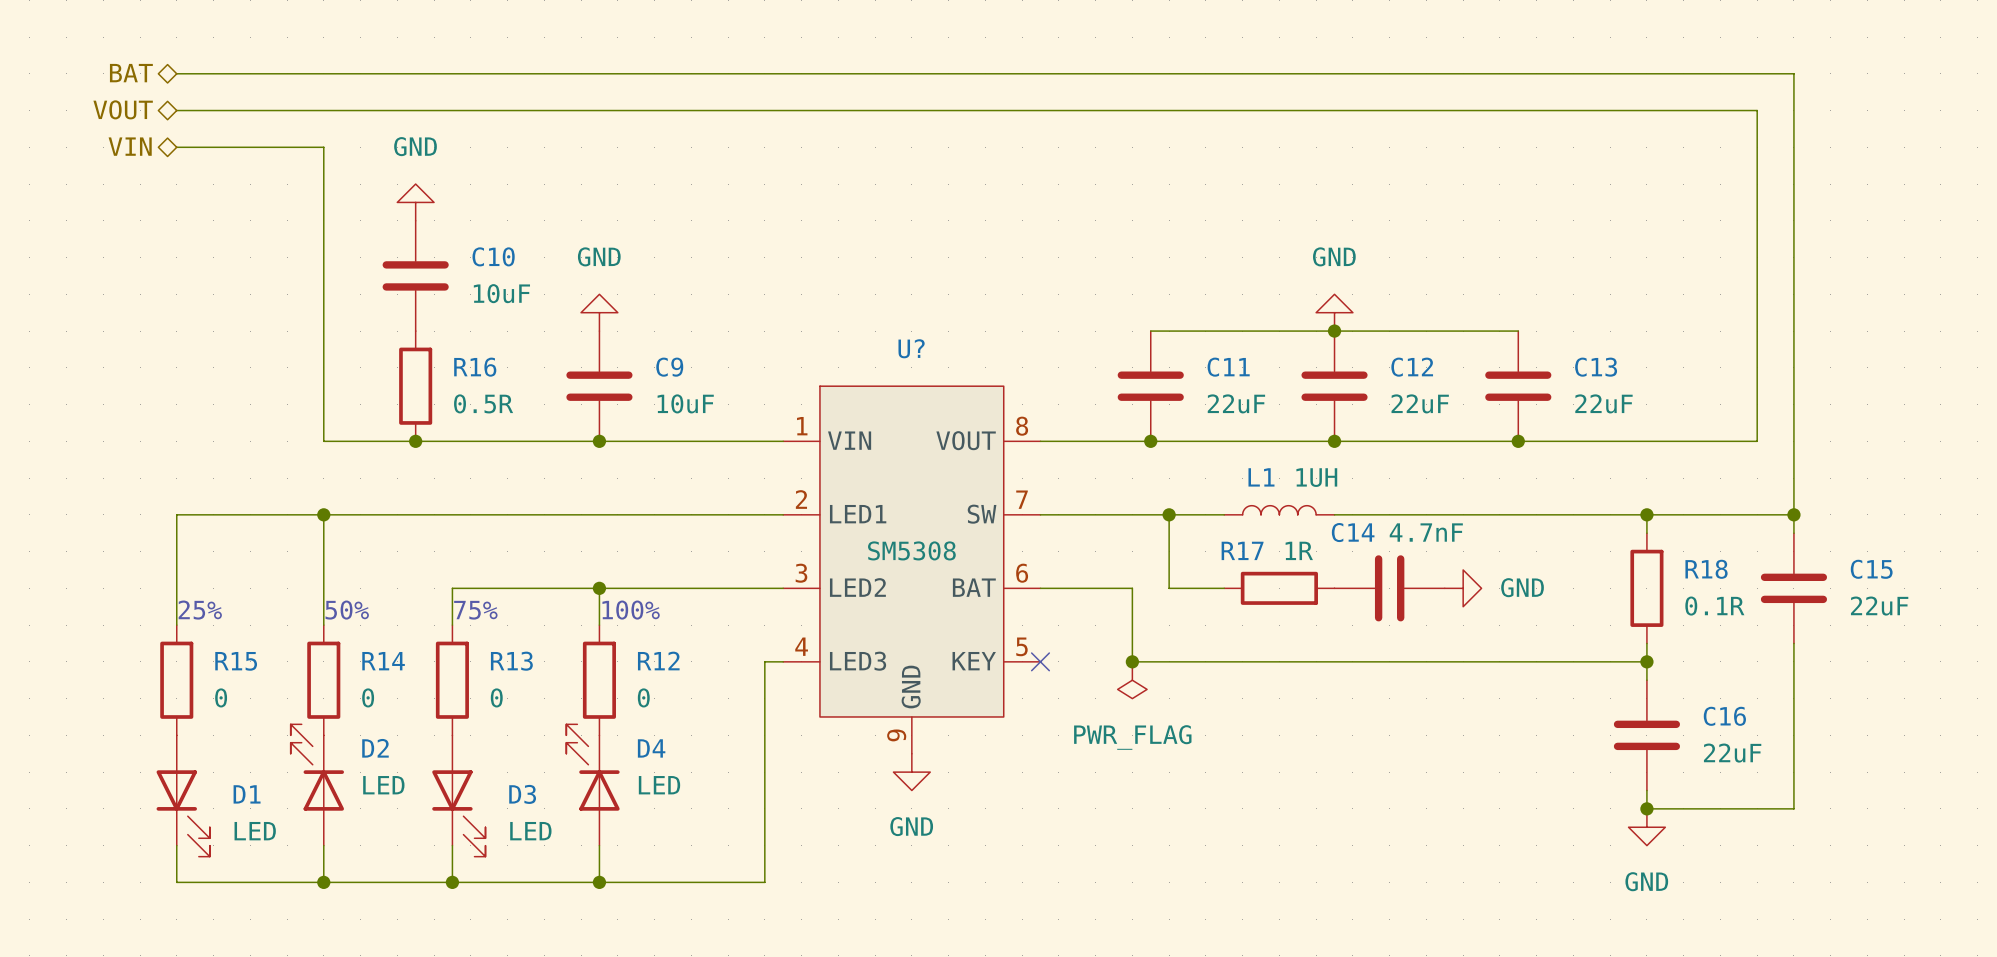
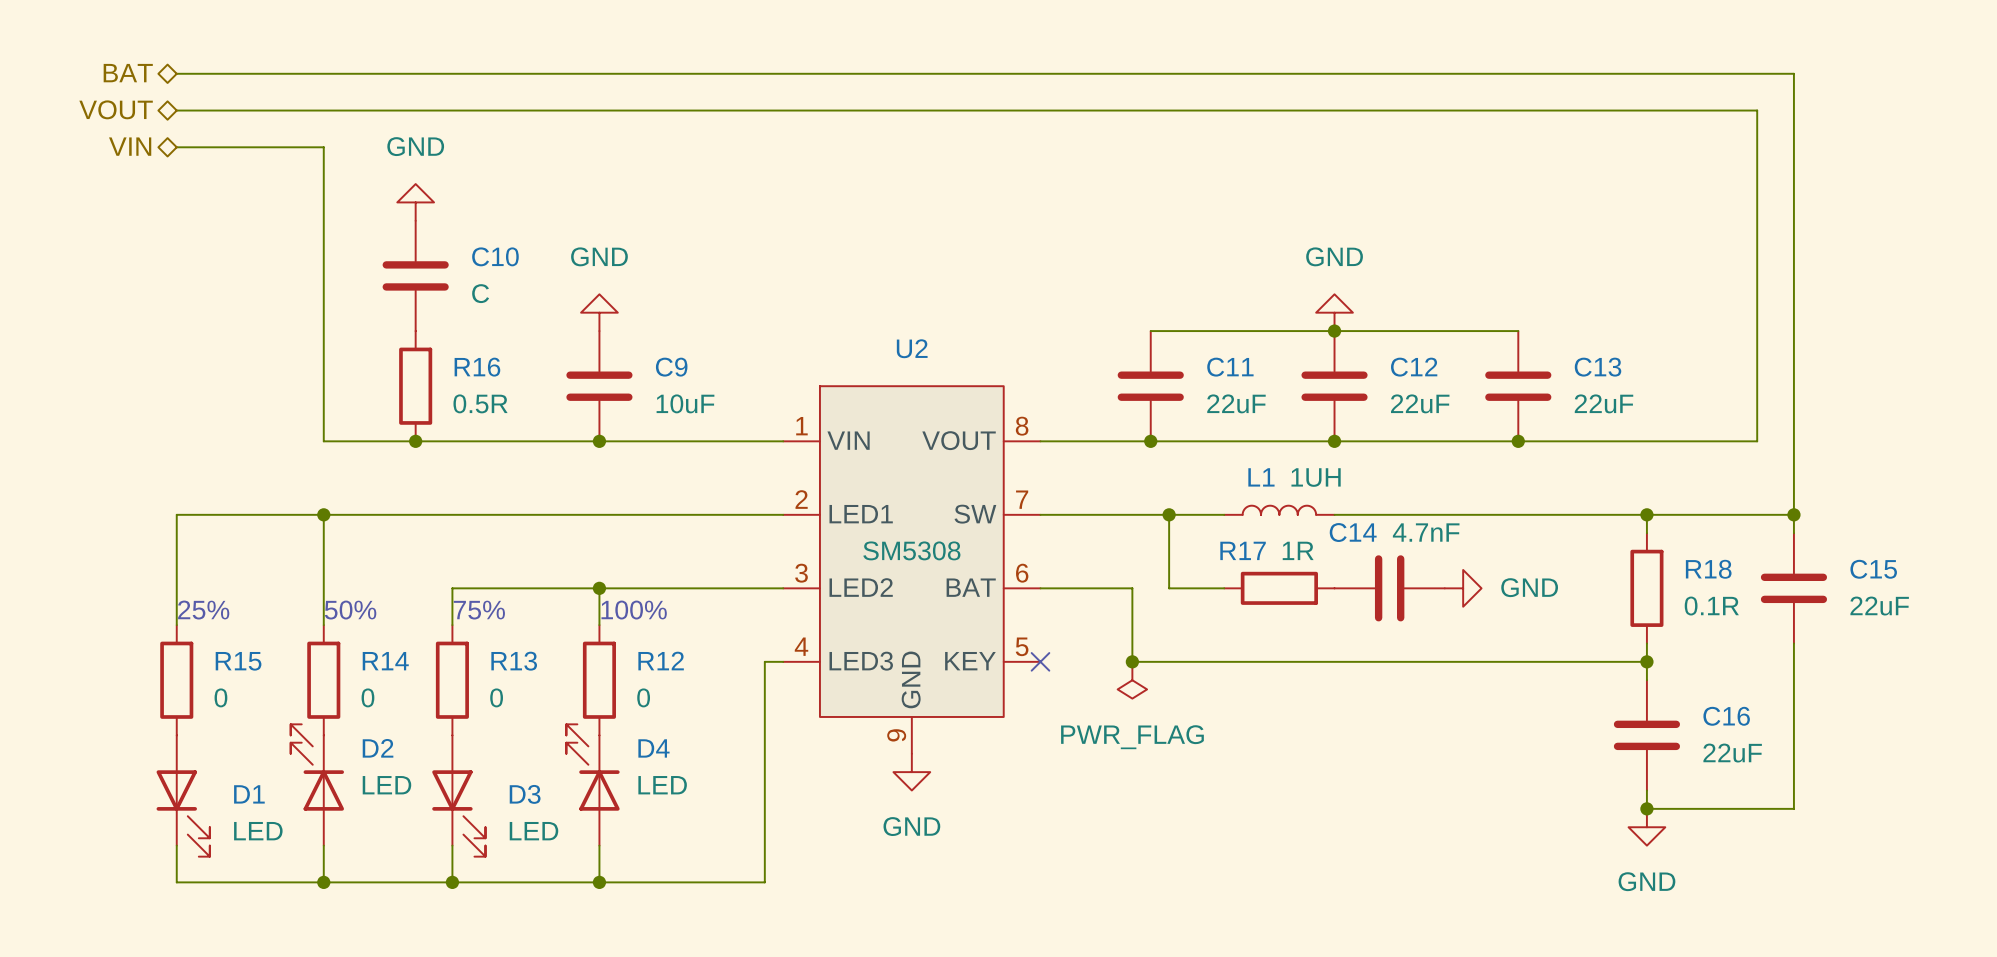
C10 value: 10uF (501, 293) -> C (480, 293)
U? name: U? (911, 348) -> U2 (912, 348)

